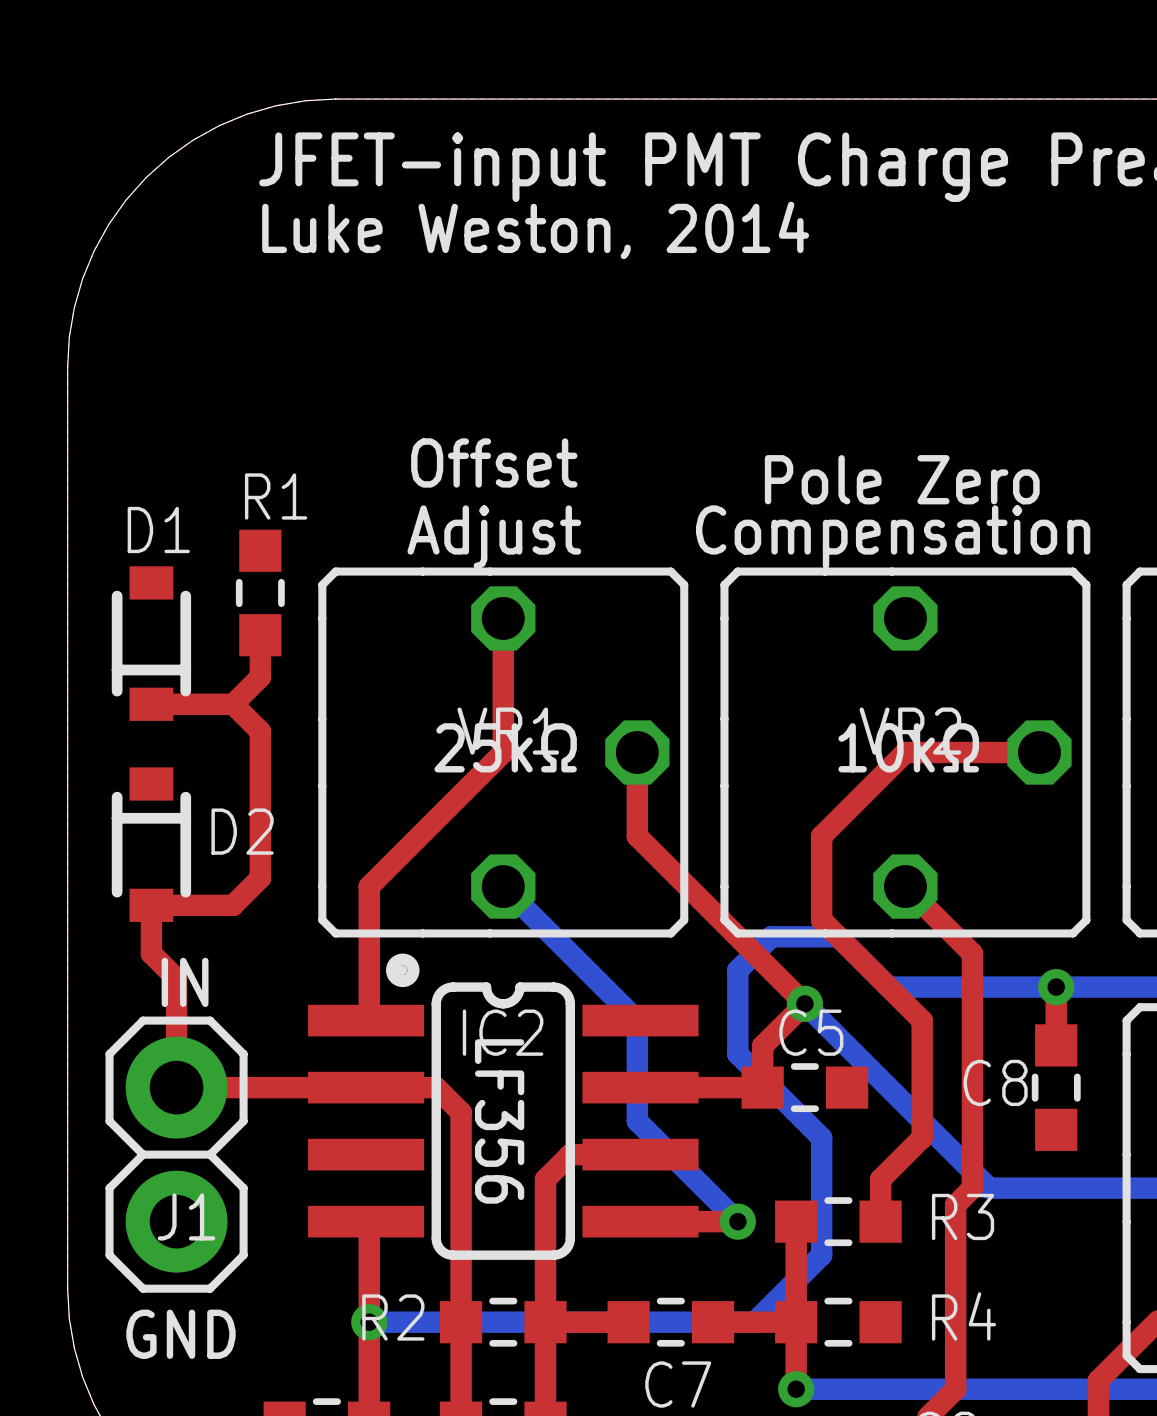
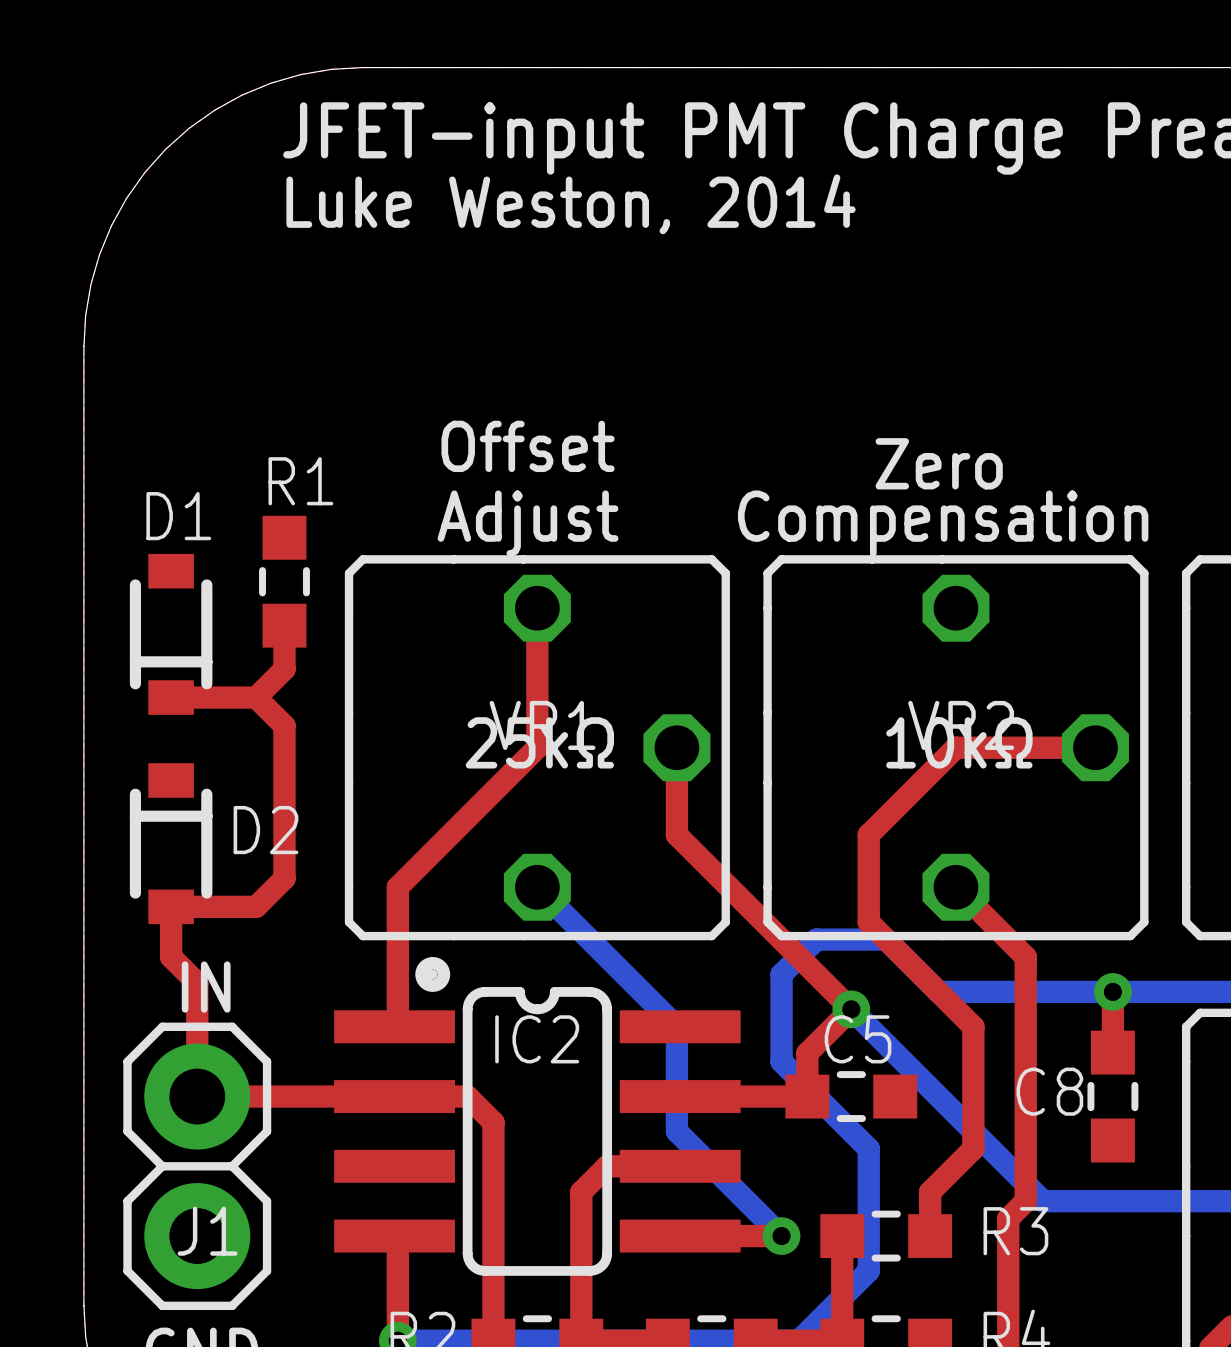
text: Pole Zero (902, 479) -> Zero (939, 463)
text: LF356 (499, 1121) -> none

